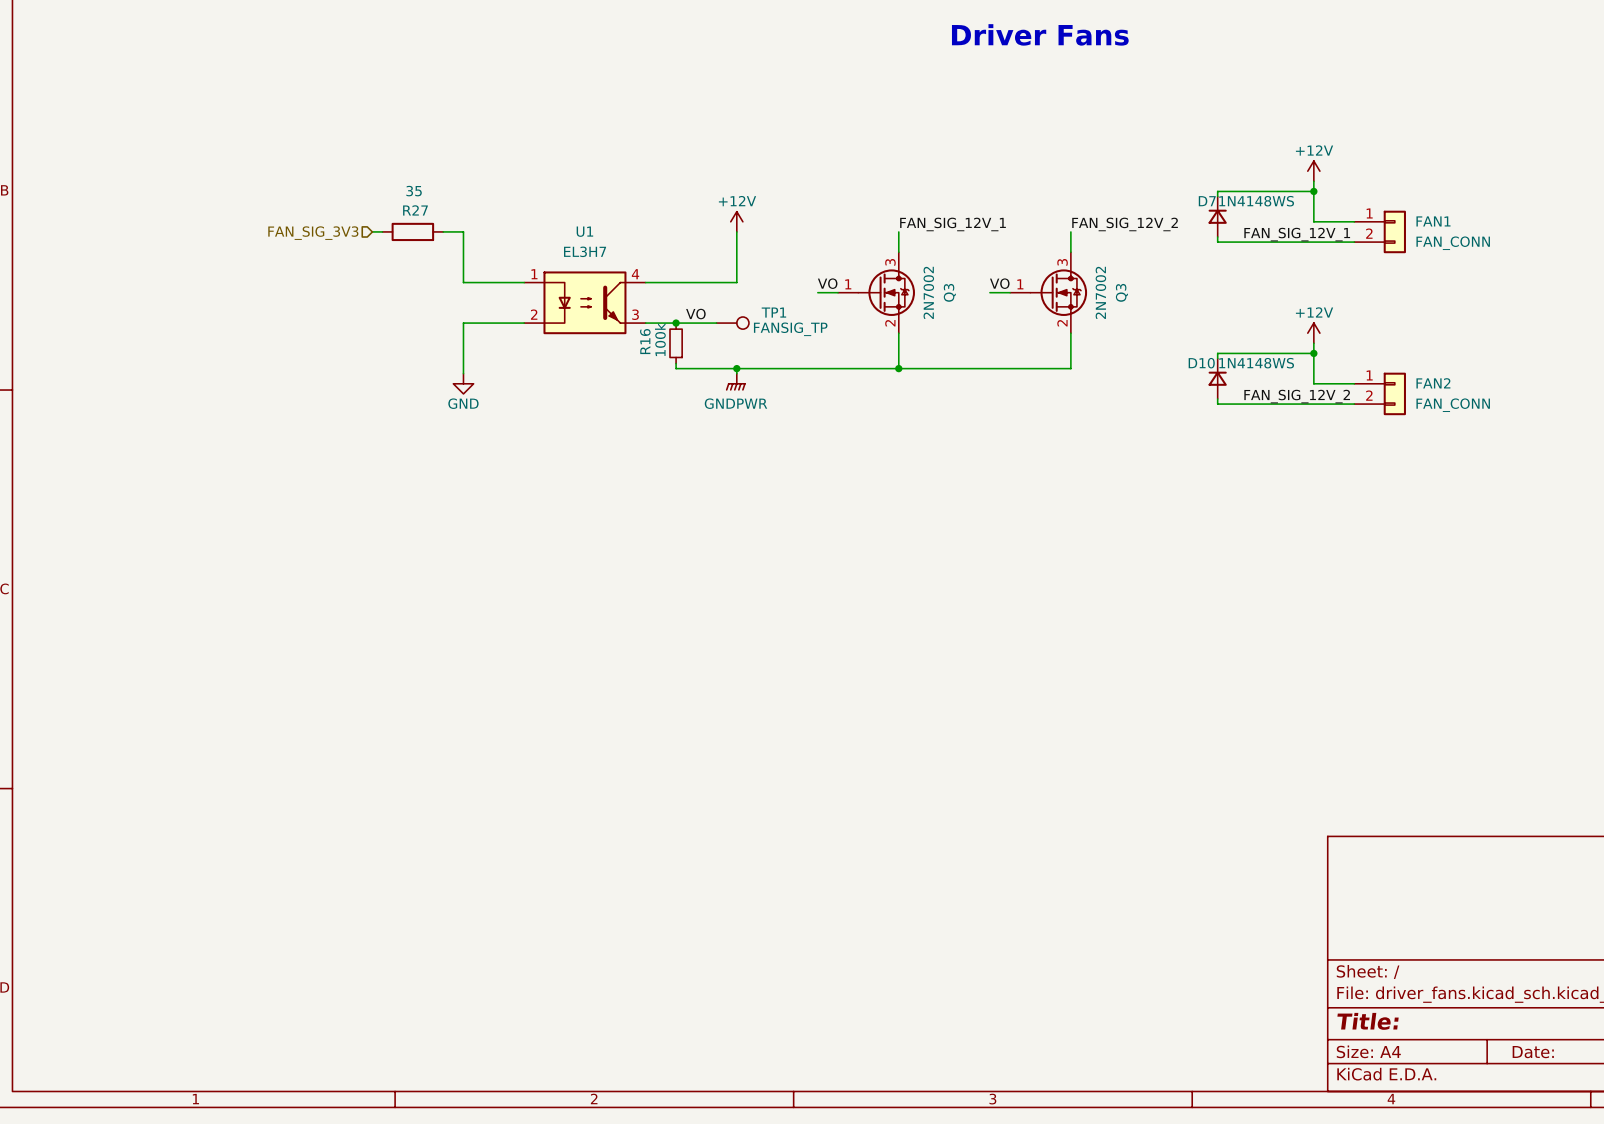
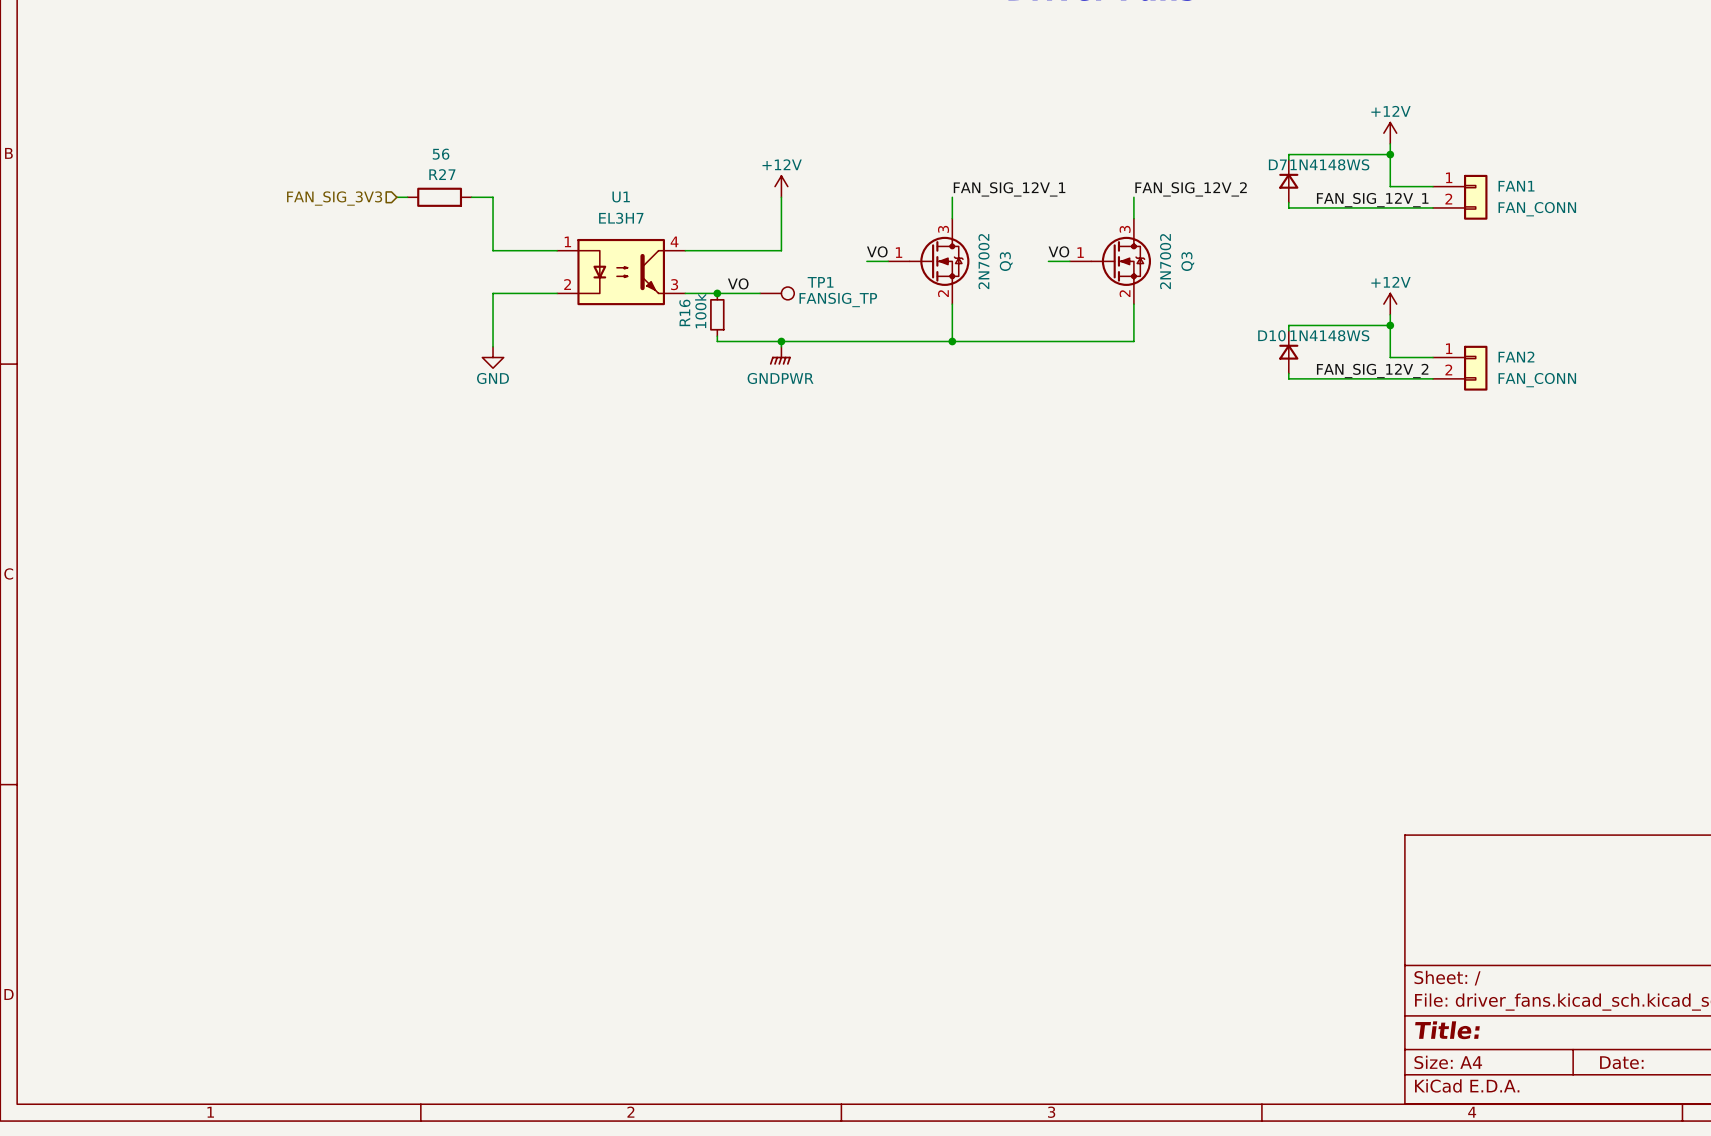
R27 value: 35 (414, 191) -> 56 (441, 154)

